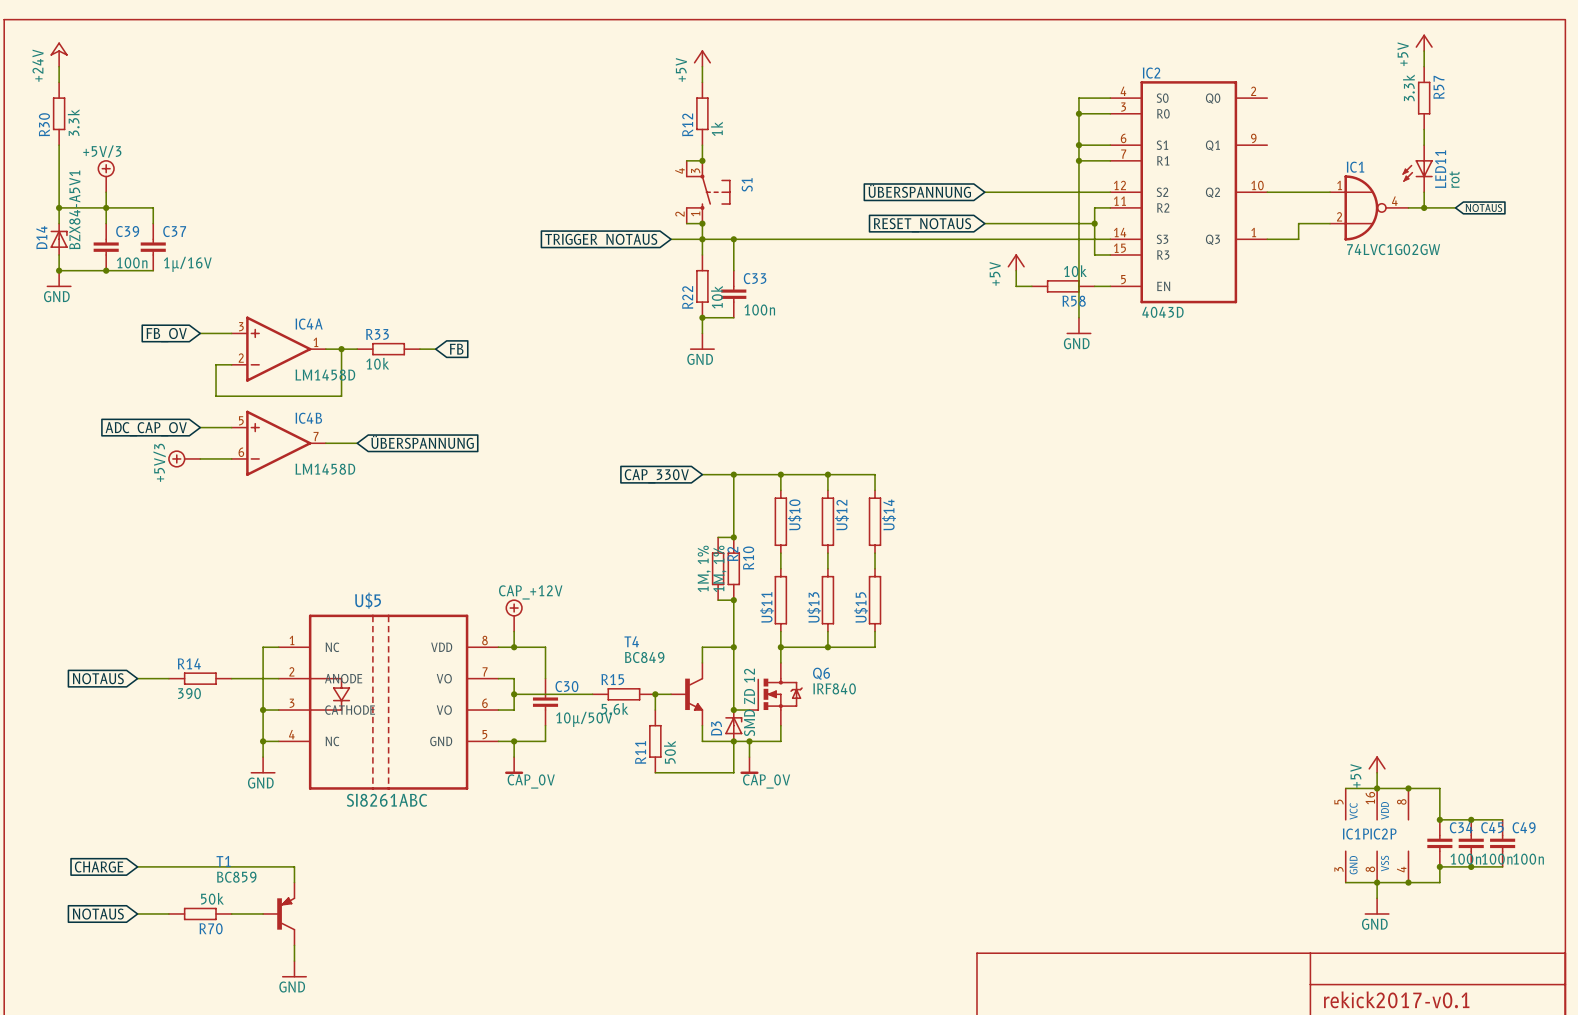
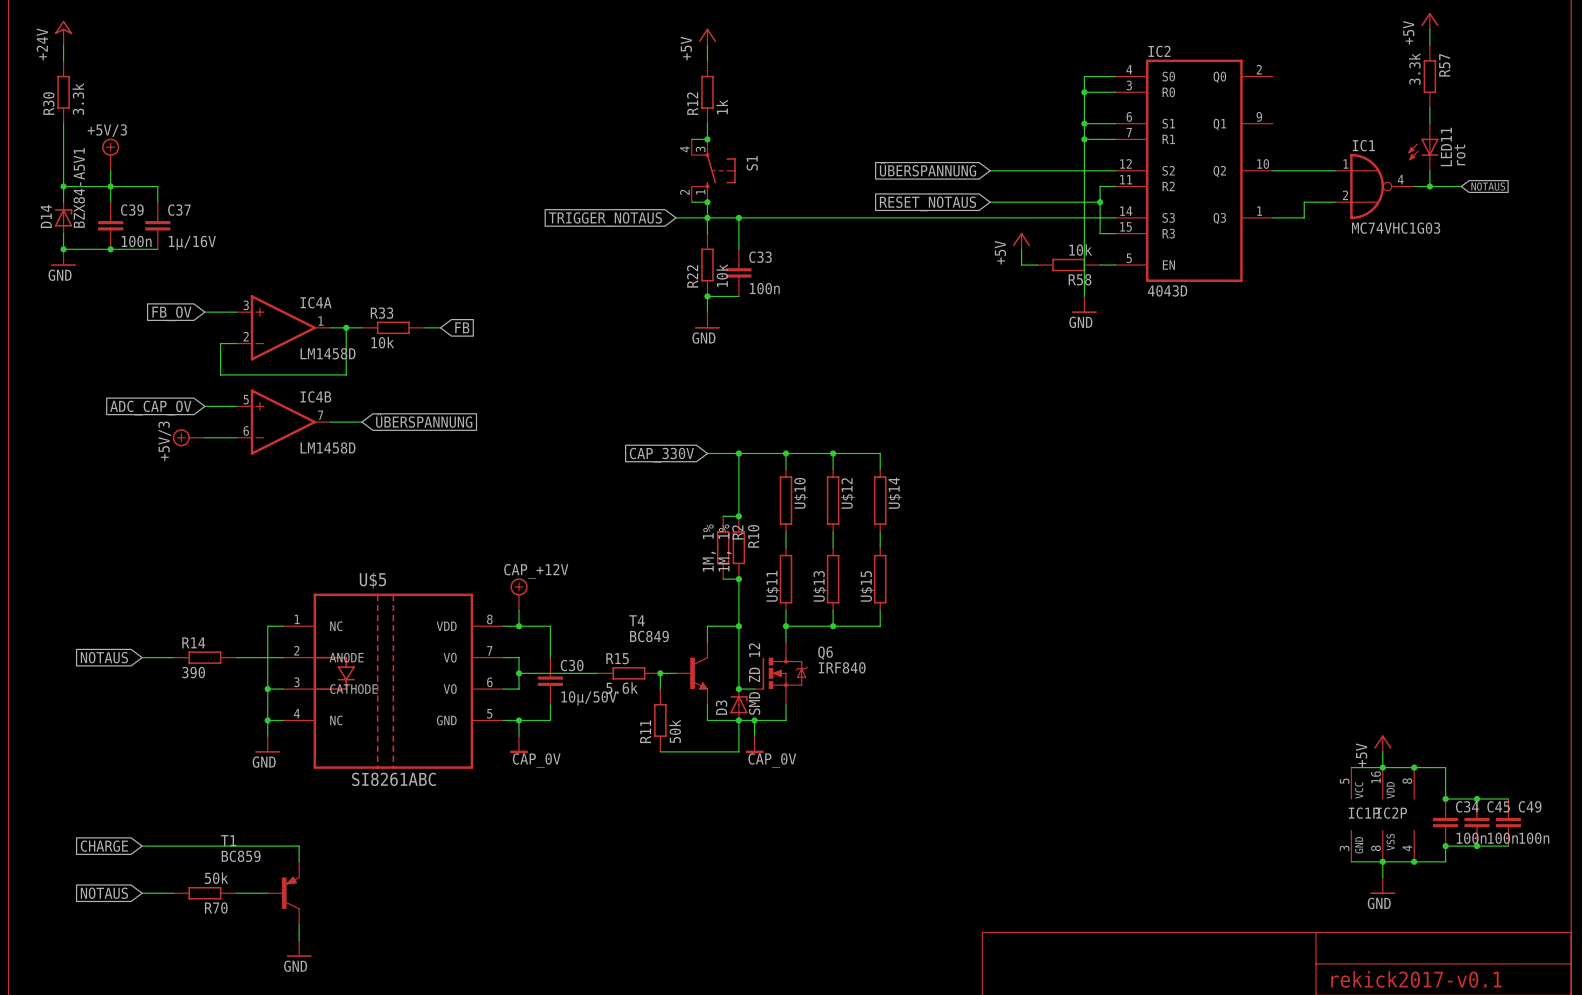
IC1 value: 74LVC1G02GW (1393, 249) -> MC74VHC1G03 (1396, 228)

